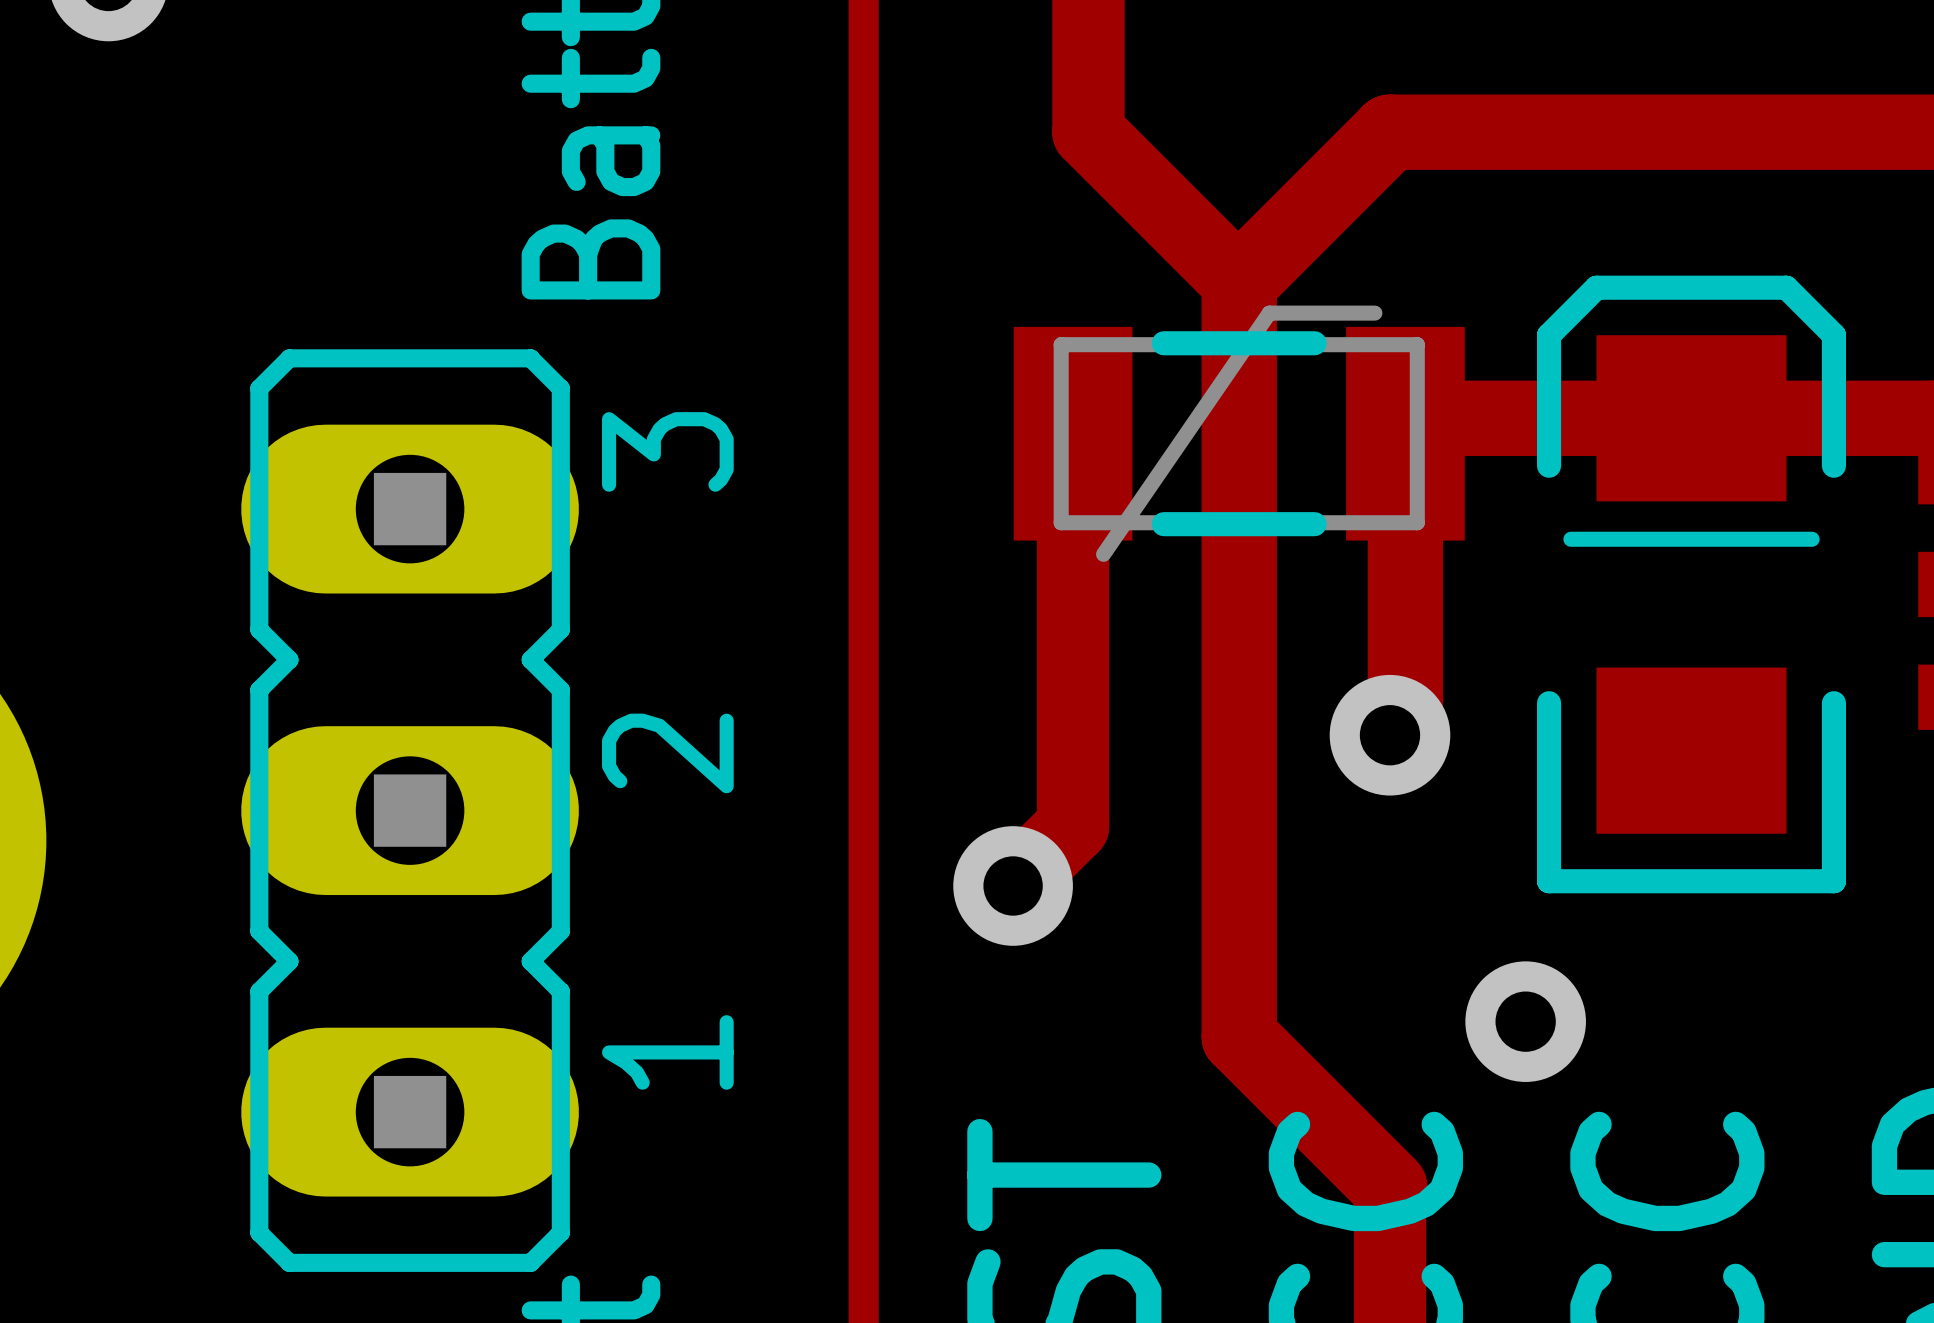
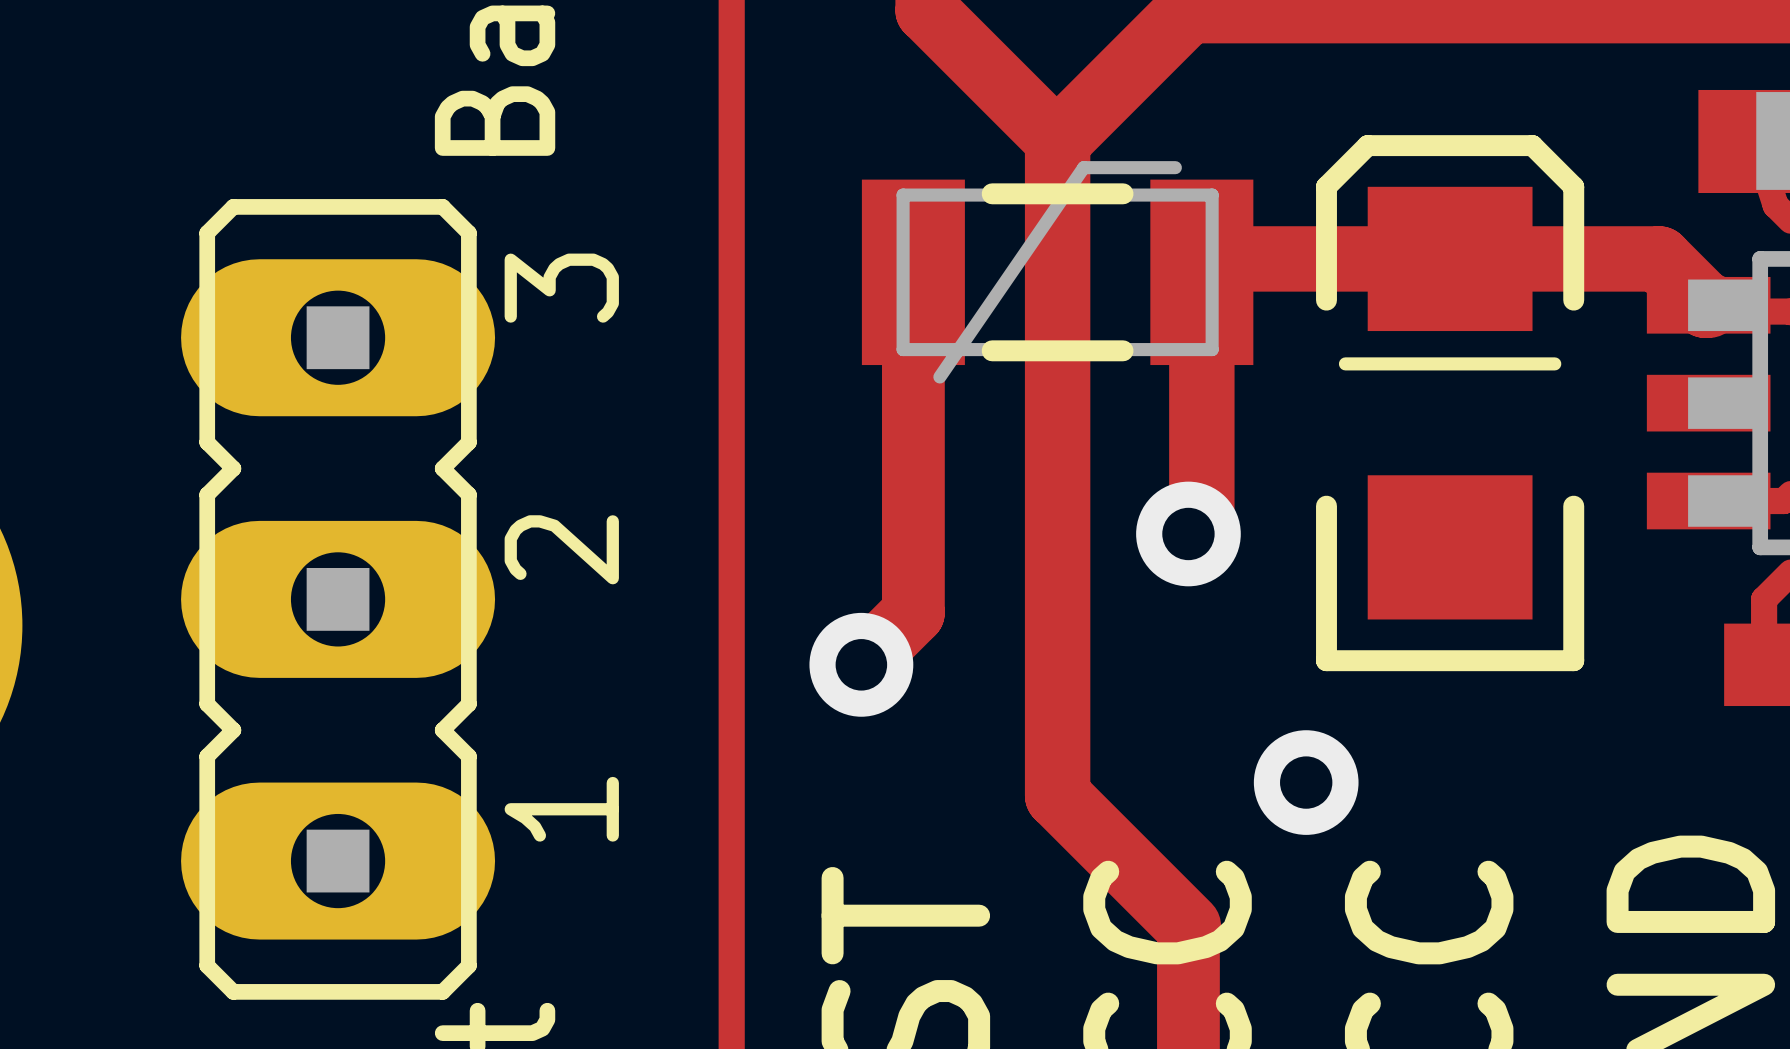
part footprint: [241, 349, 579, 1272] -> [181, 199, 496, 1000]

